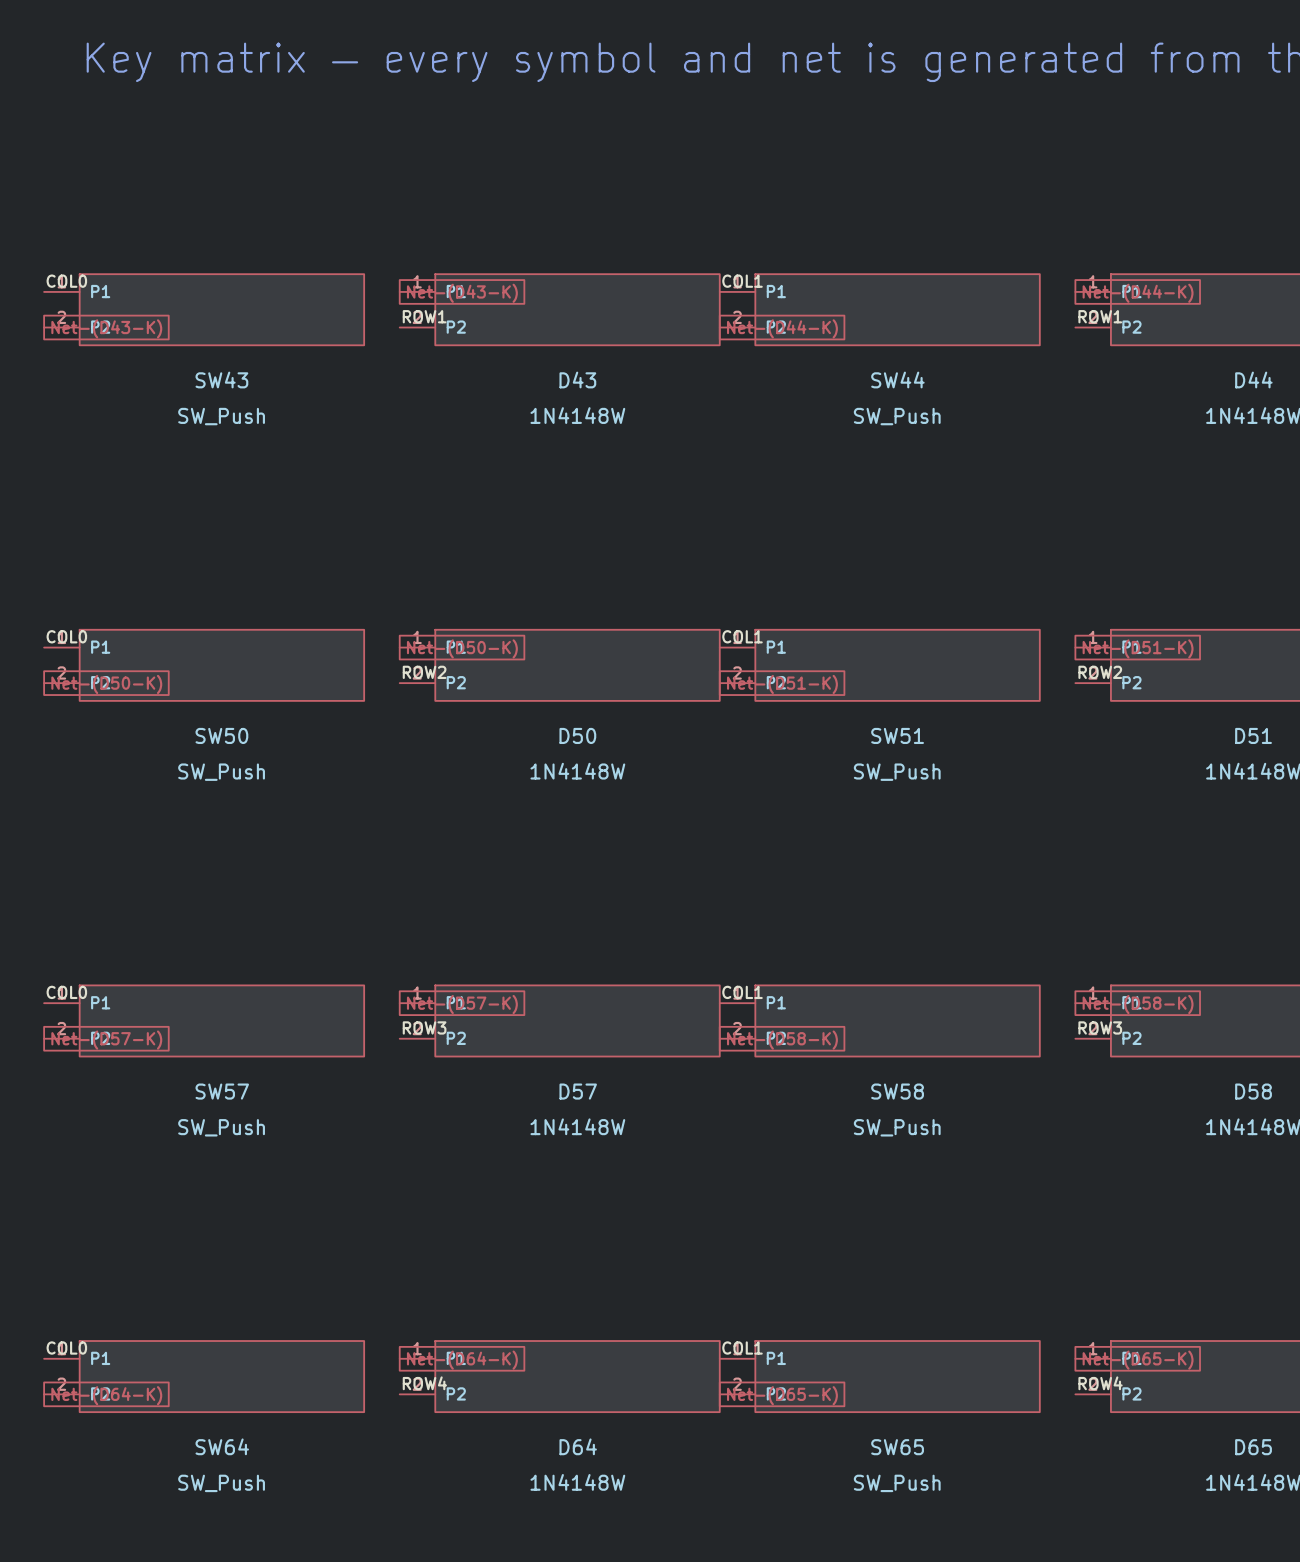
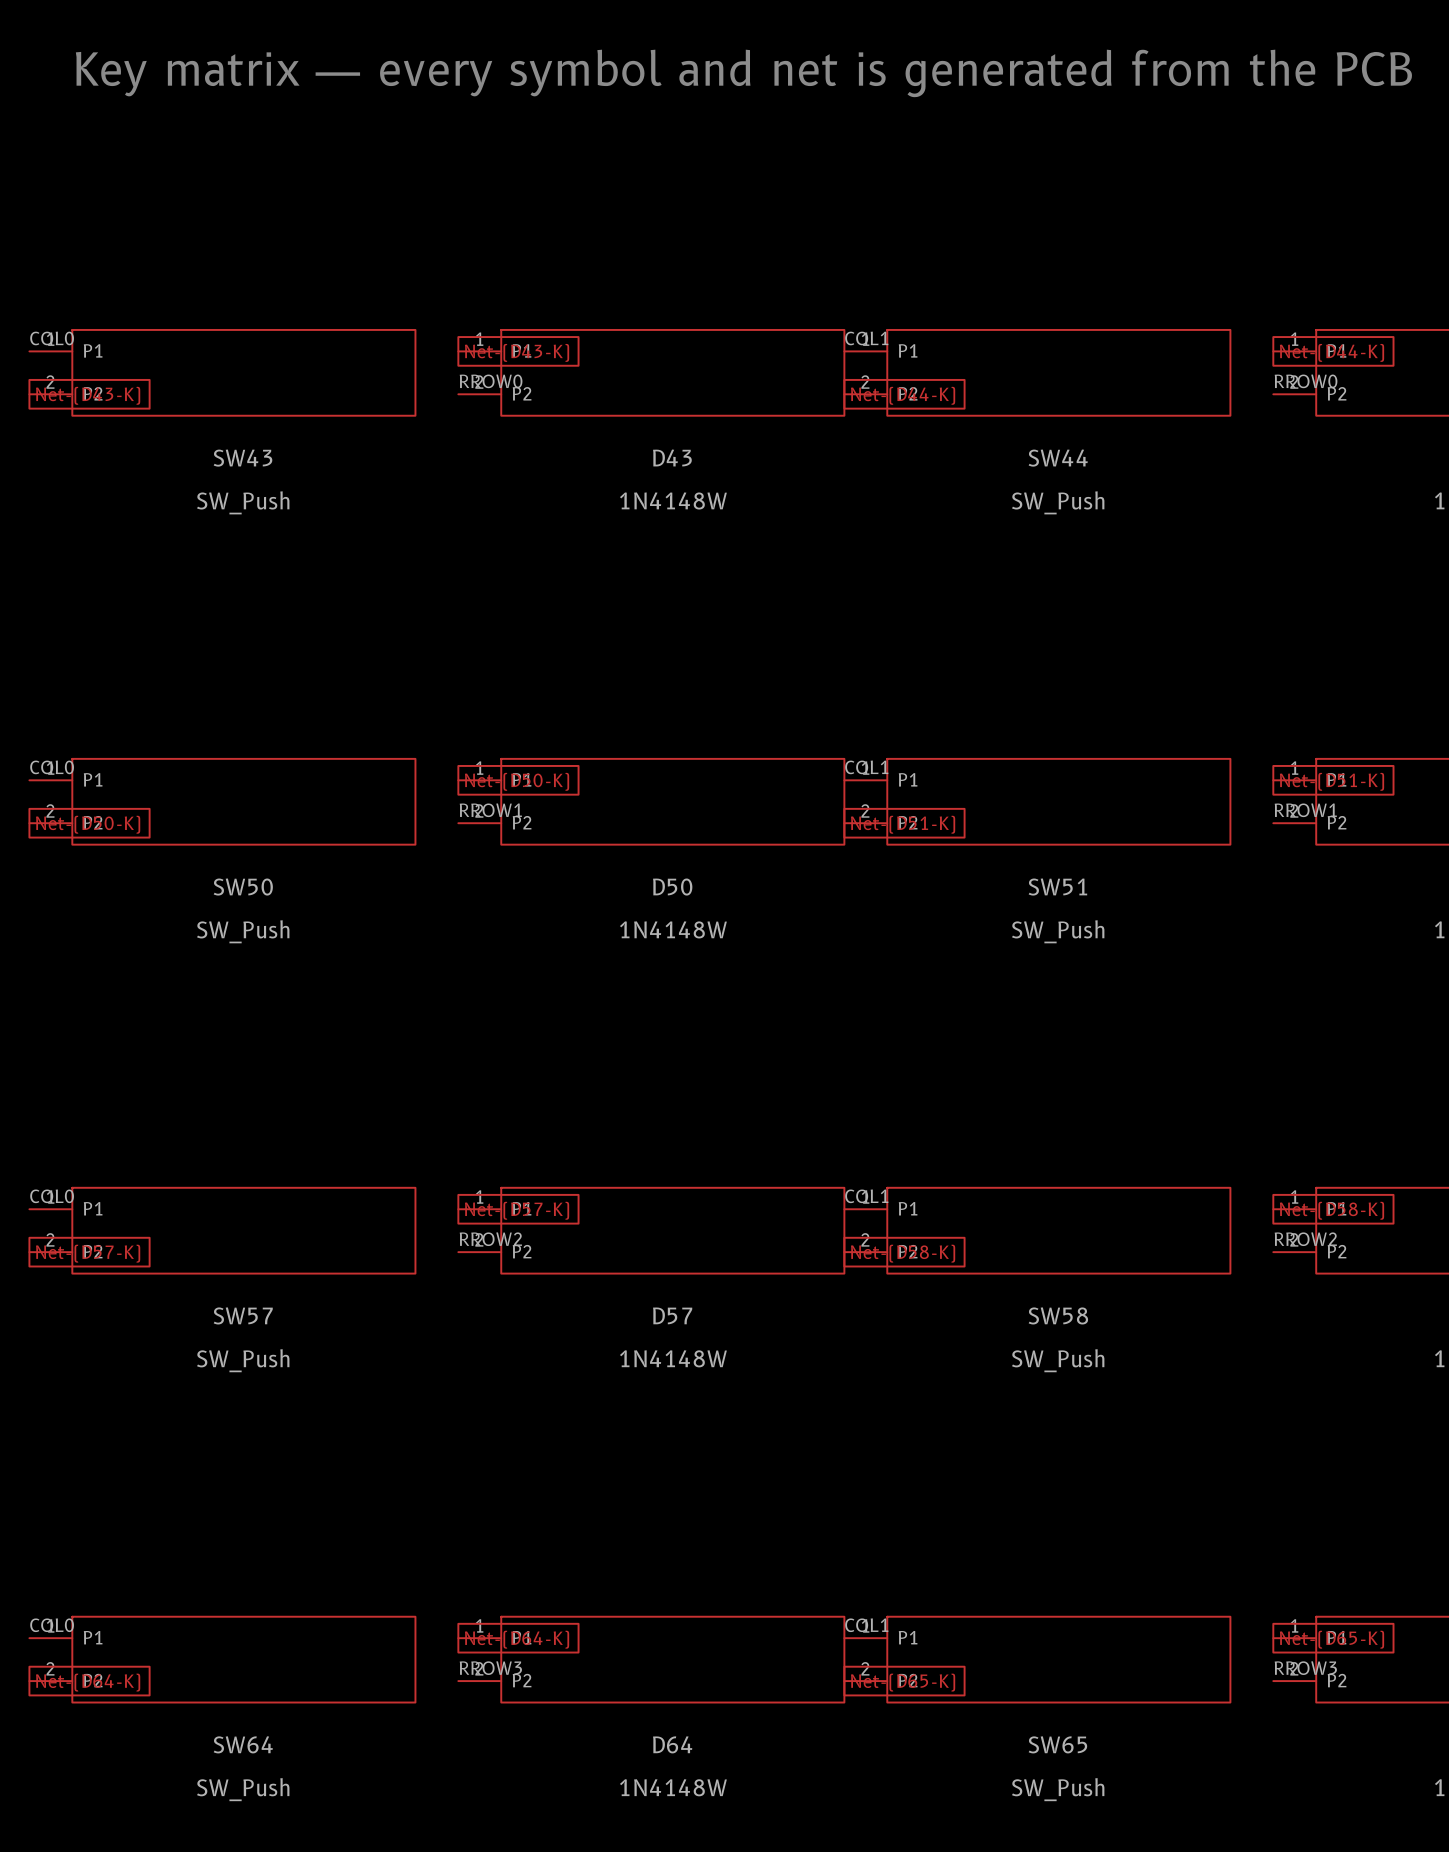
label: ROW1 (424, 316) -> RROW0 (491, 381)
label: ROW1 (1100, 316) -> RROW0 (1306, 381)
label: ROW2 (424, 672) -> RROW1 (490, 810)
label: ROW2 (1100, 672) -> RROW1 (1305, 810)
label: ROW3 (424, 1027) -> RROW2 (490, 1239)
label: ROW3 (1100, 1027) -> RROW2 (1305, 1239)
label: ROW4 (424, 1383) -> RROW3 (490, 1668)
label: ROW4 (1100, 1383) -> RROW3 (1305, 1668)

